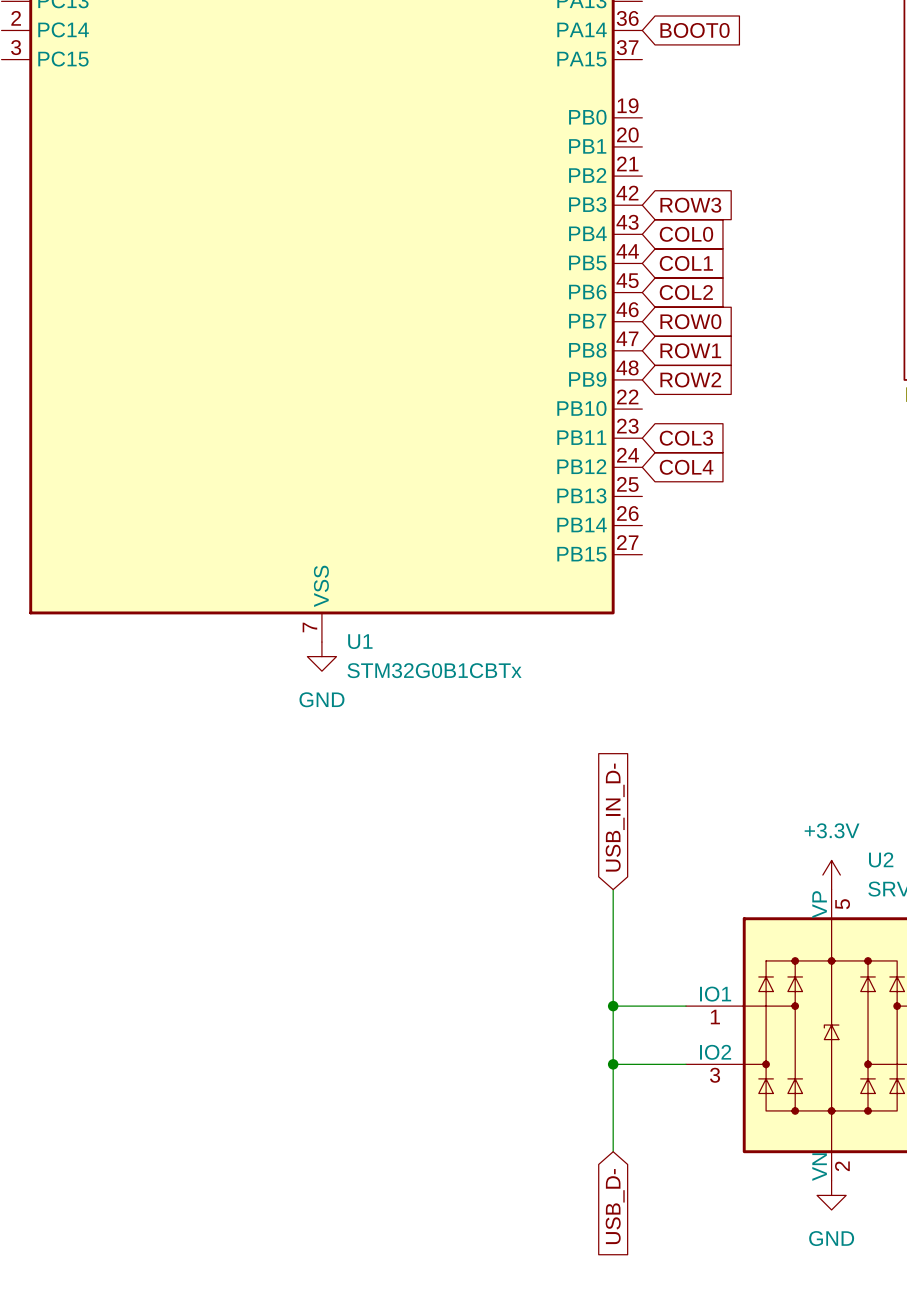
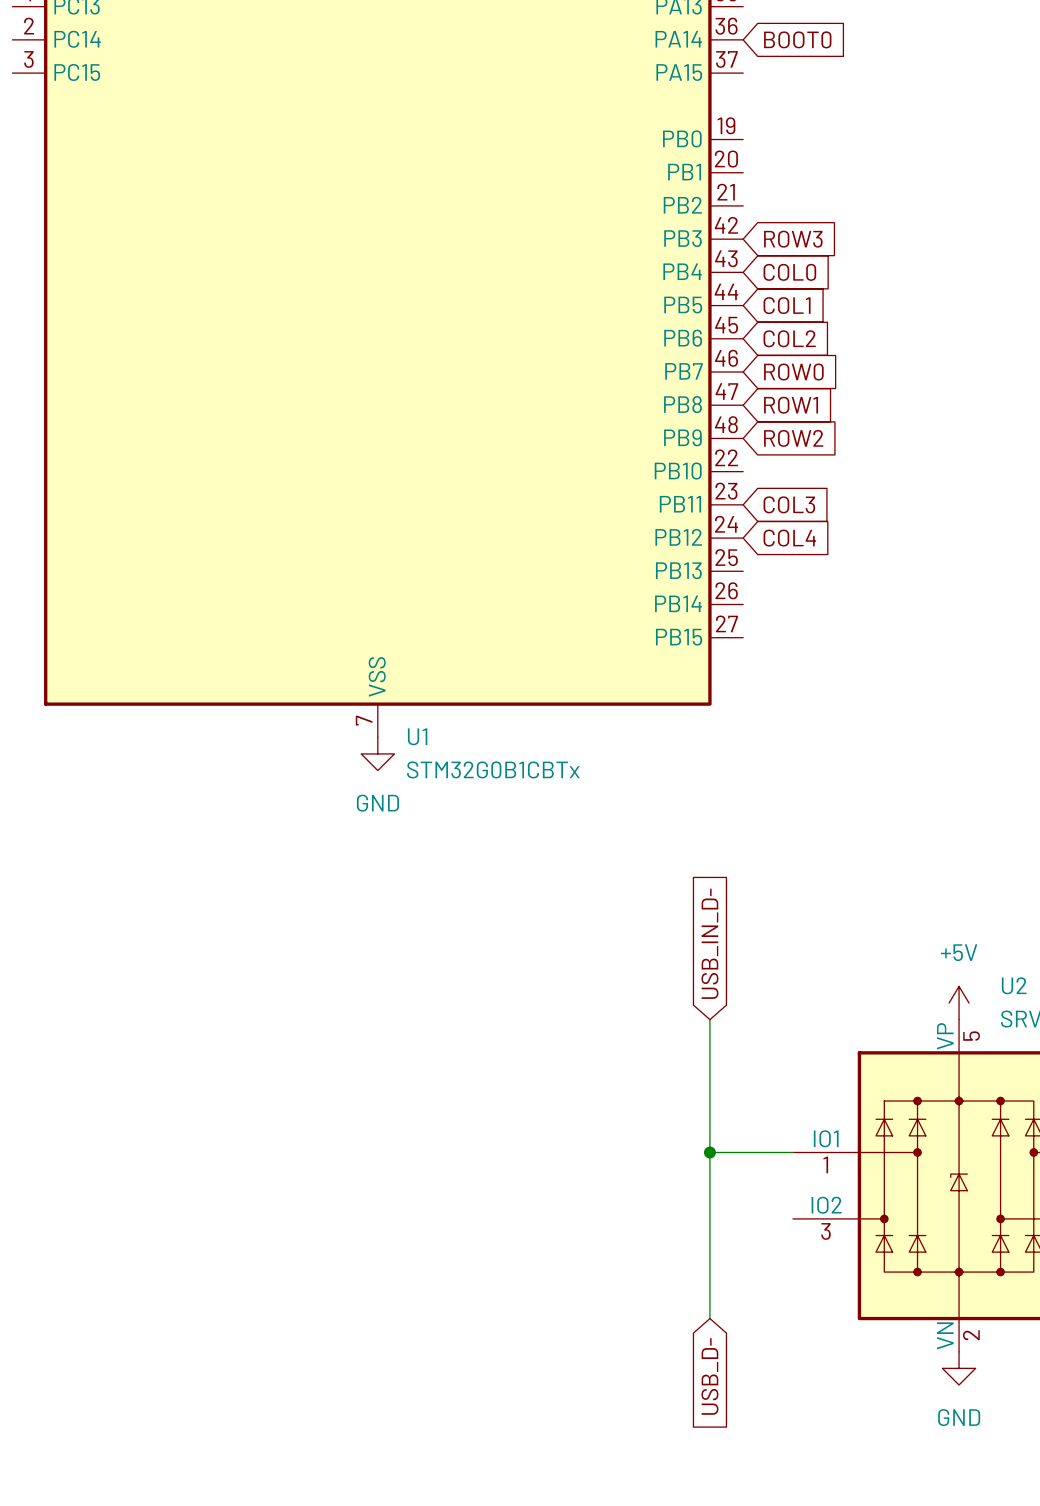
power symbol: +3.3V (831, 875) -> +5V (959, 1003)
wire: (613, 1064) (685, 1064) -> none
junction: (613, 1064) -> none

